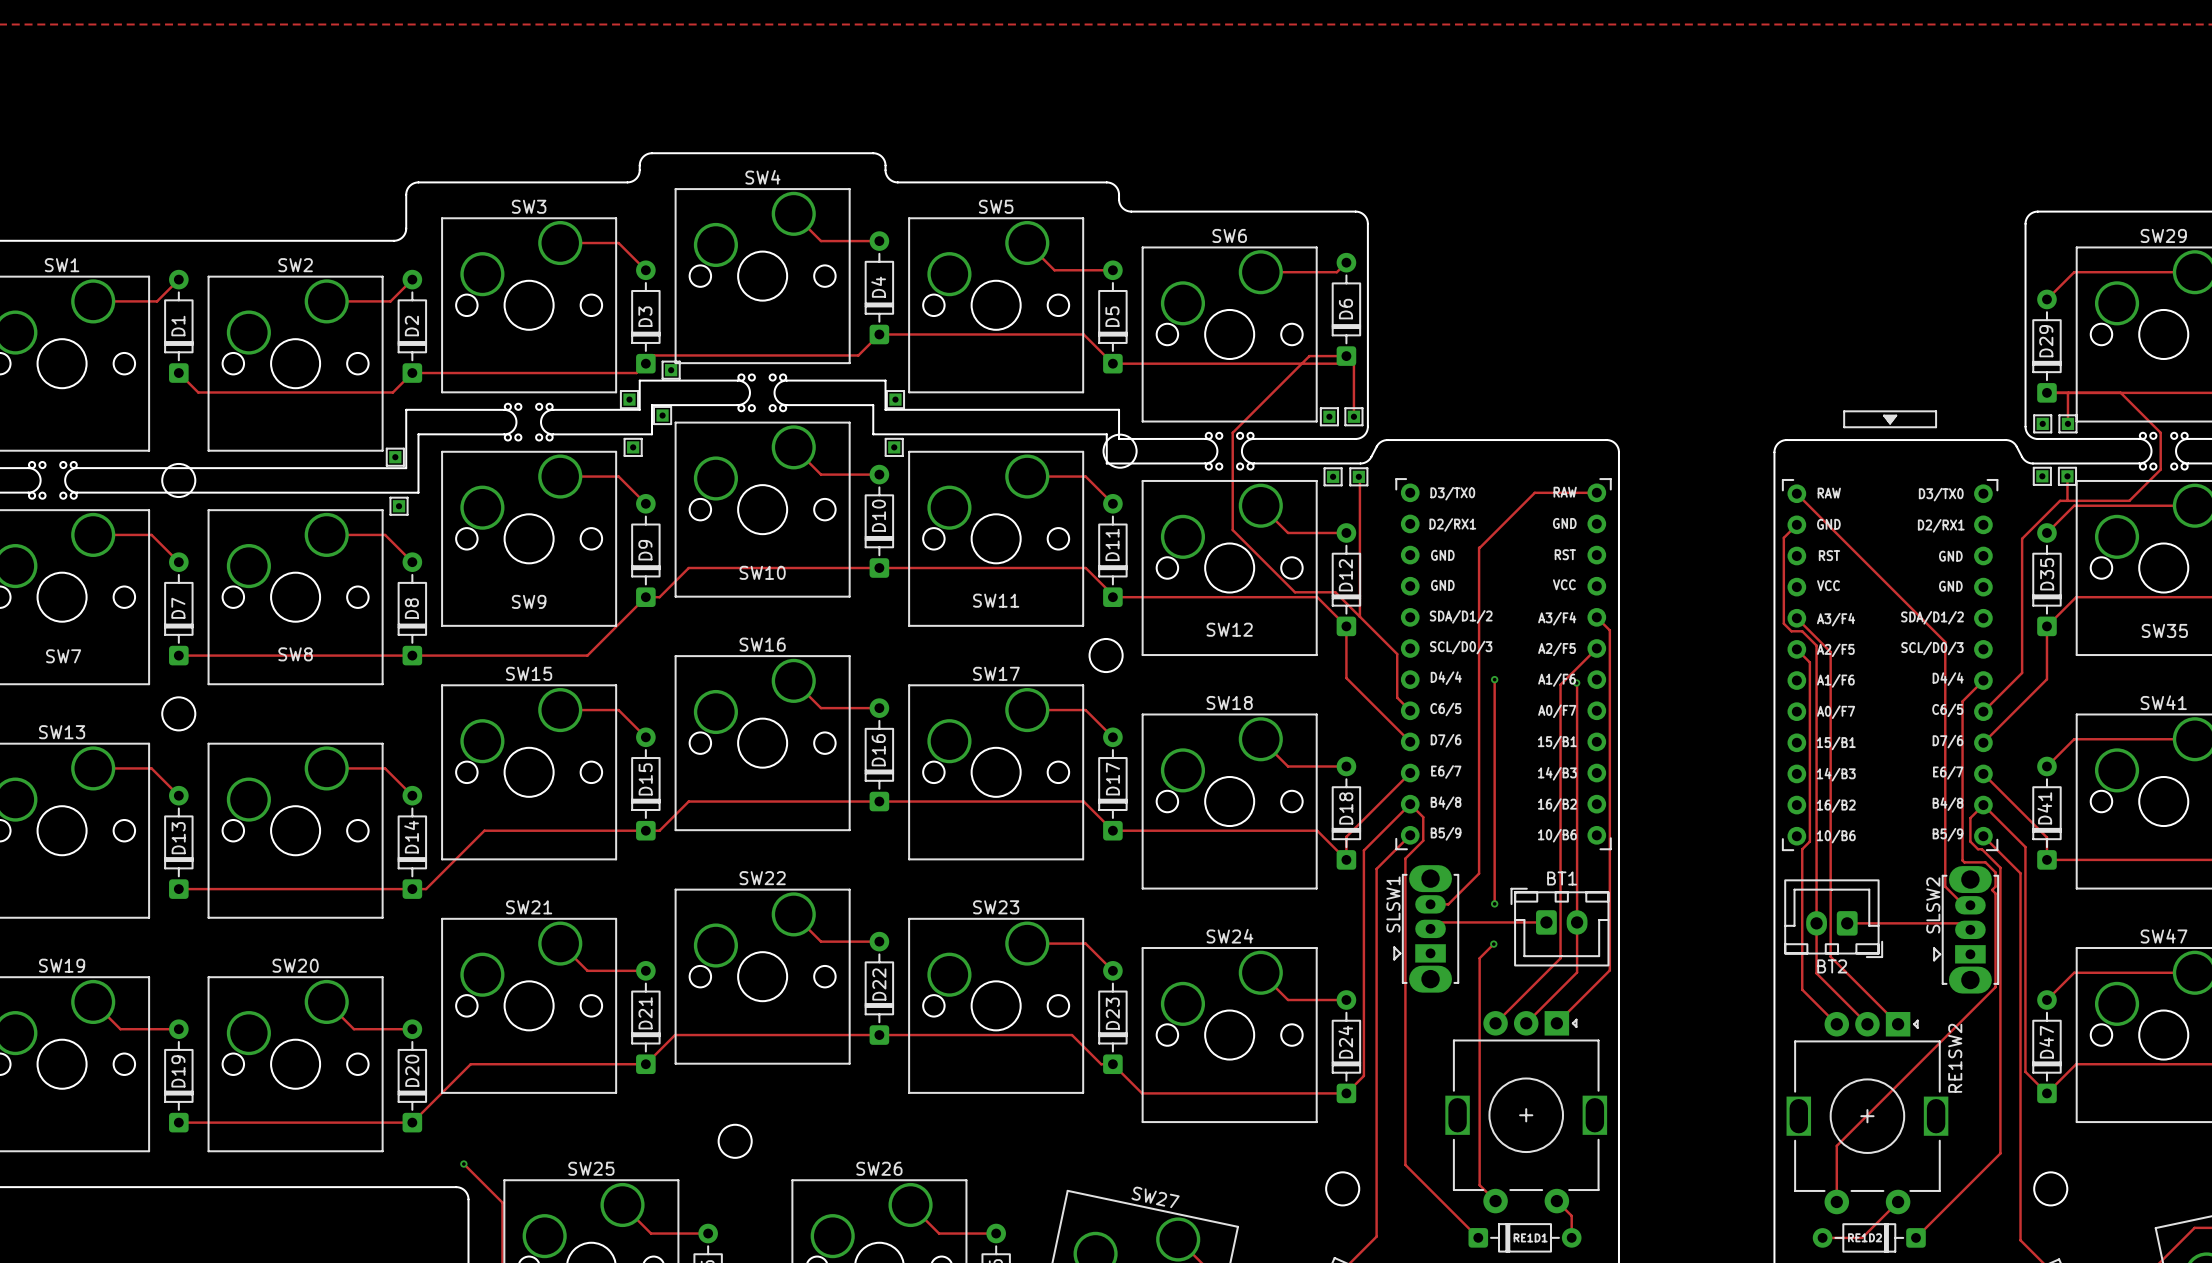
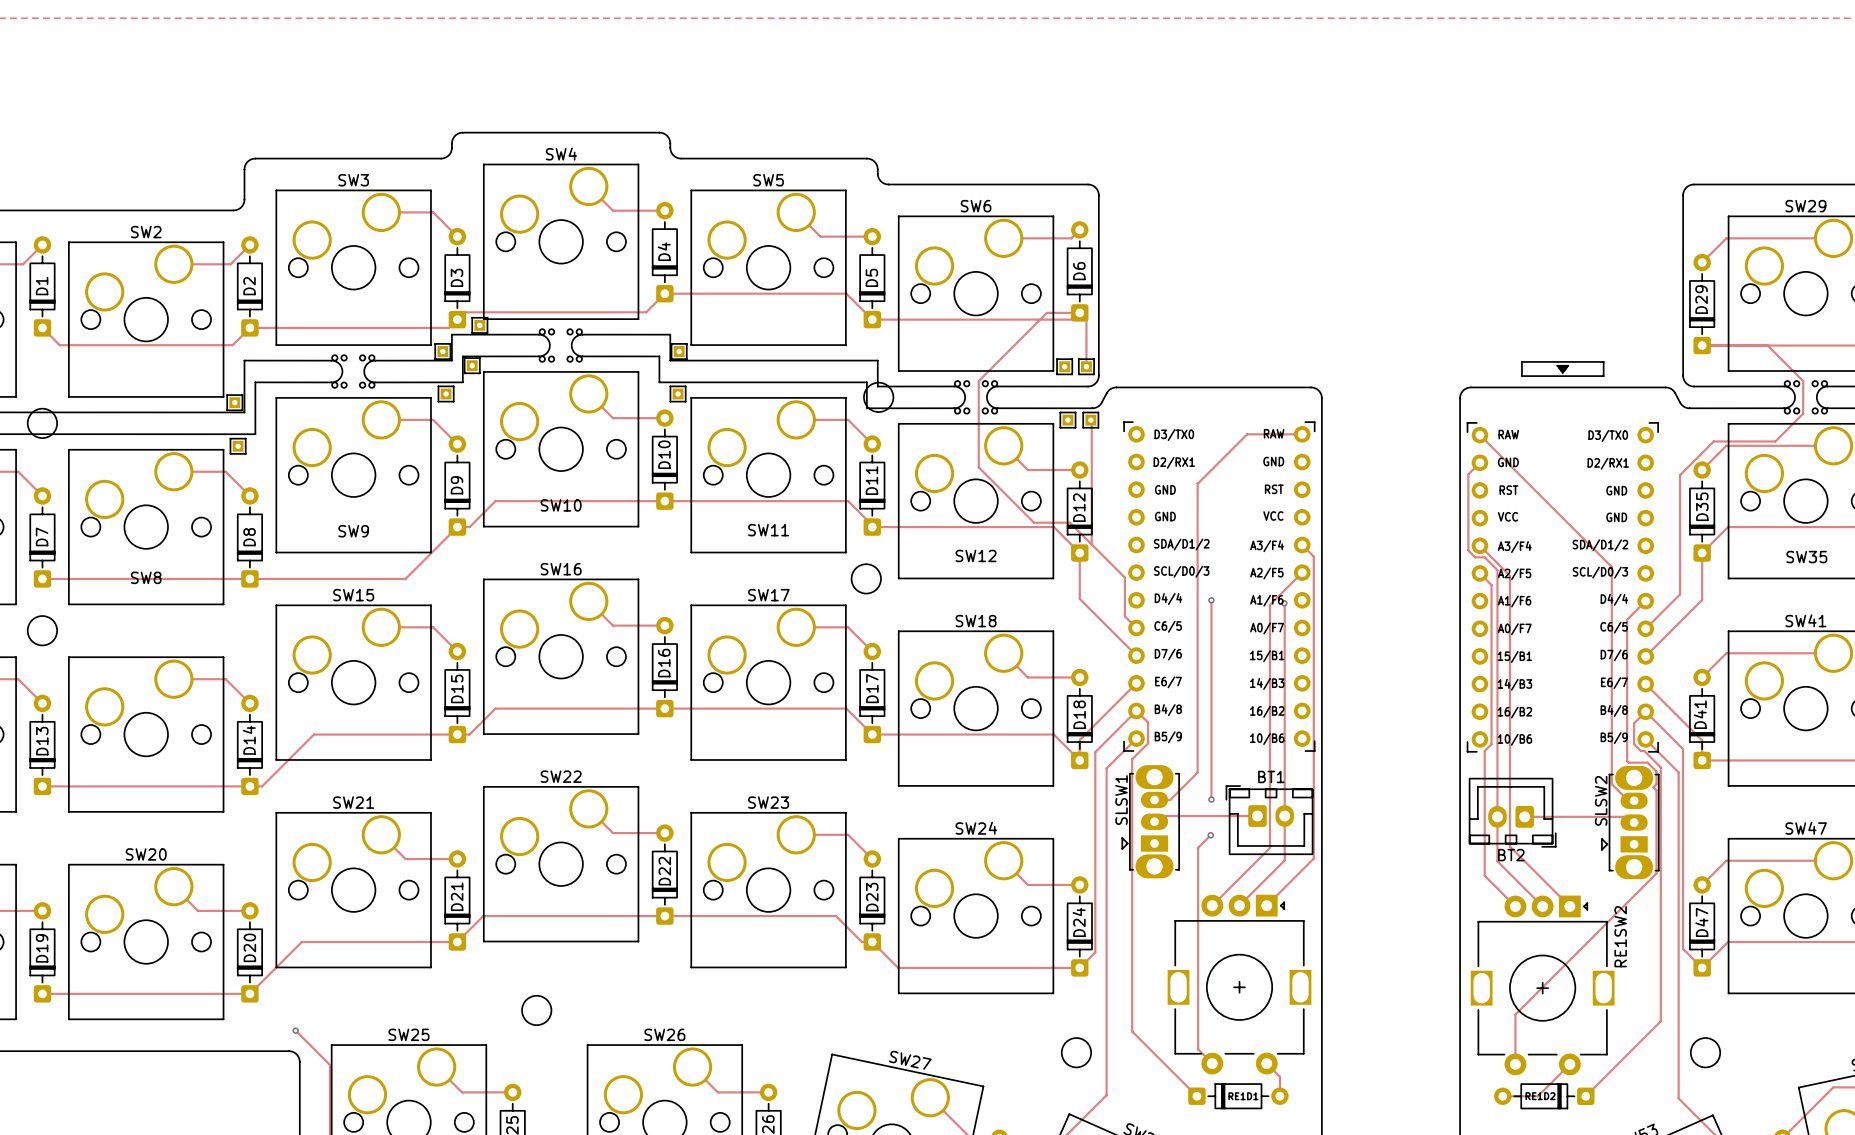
track: (2068, 392) (2067, 423) -> none
part: (2042, 423) -> none
part: (2067, 423) -> none
part: (2042, 476) -> none
track: (2067, 476) (2067, 500) -> none
part: (2067, 476) -> none

